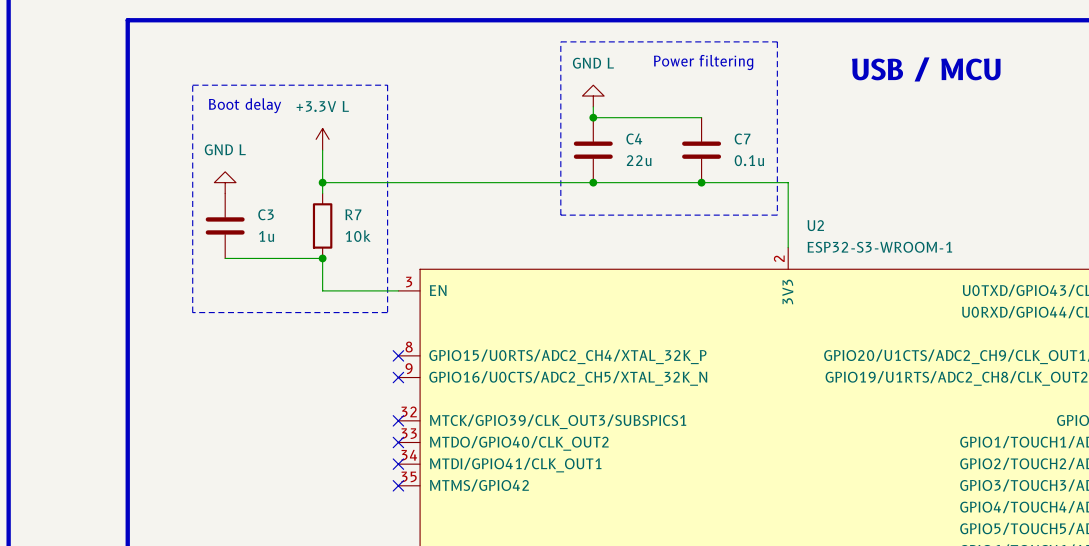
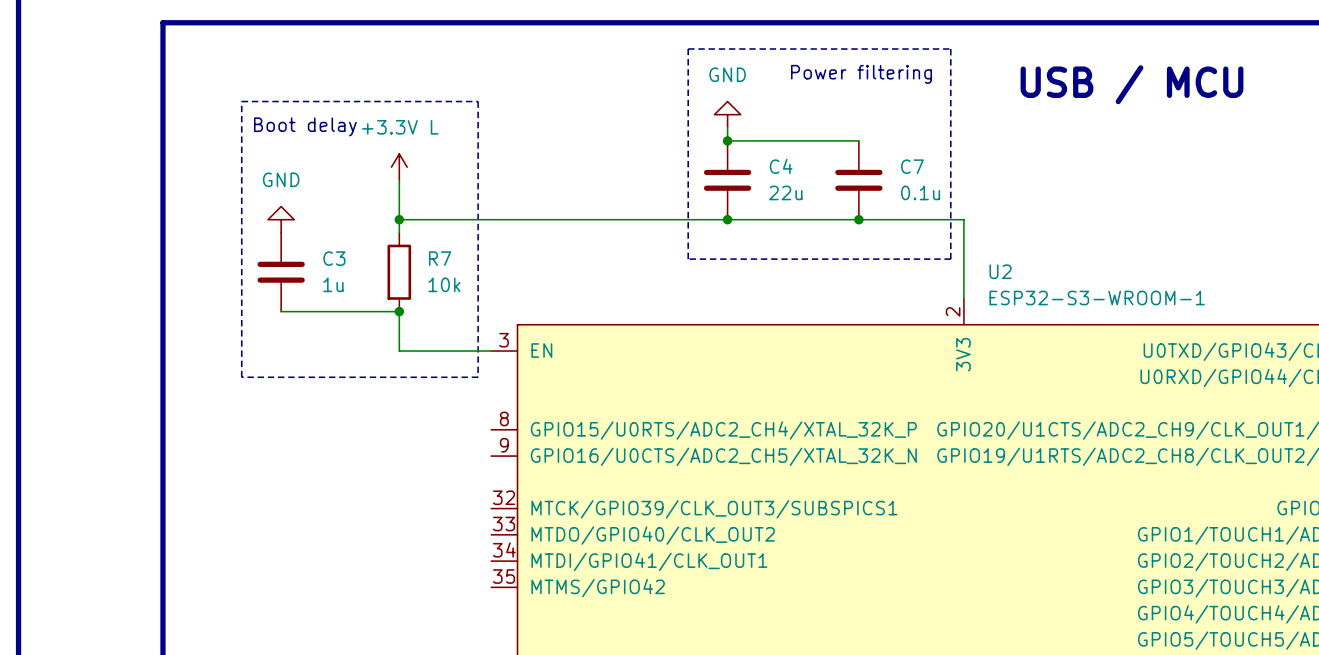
power symbol: GND L (593, 96) -> GND (727, 114)
power symbol: GND L (225, 182) -> GND (281, 219)
no-connect mark: (398, 355) -> none
no-connect mark: (398, 377) -> none
no-connect mark: (398, 420) -> none
no-connect mark: (398, 442) -> none
no-connect mark: (398, 464) -> none
no-connect mark: (398, 485) -> none

